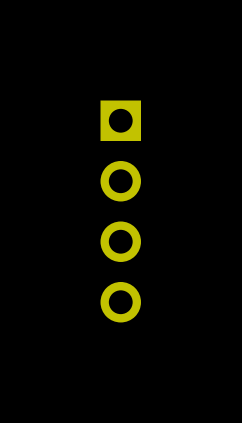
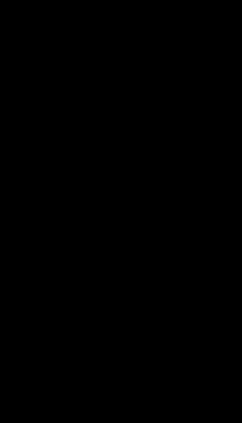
part: (120, 211) -> none

